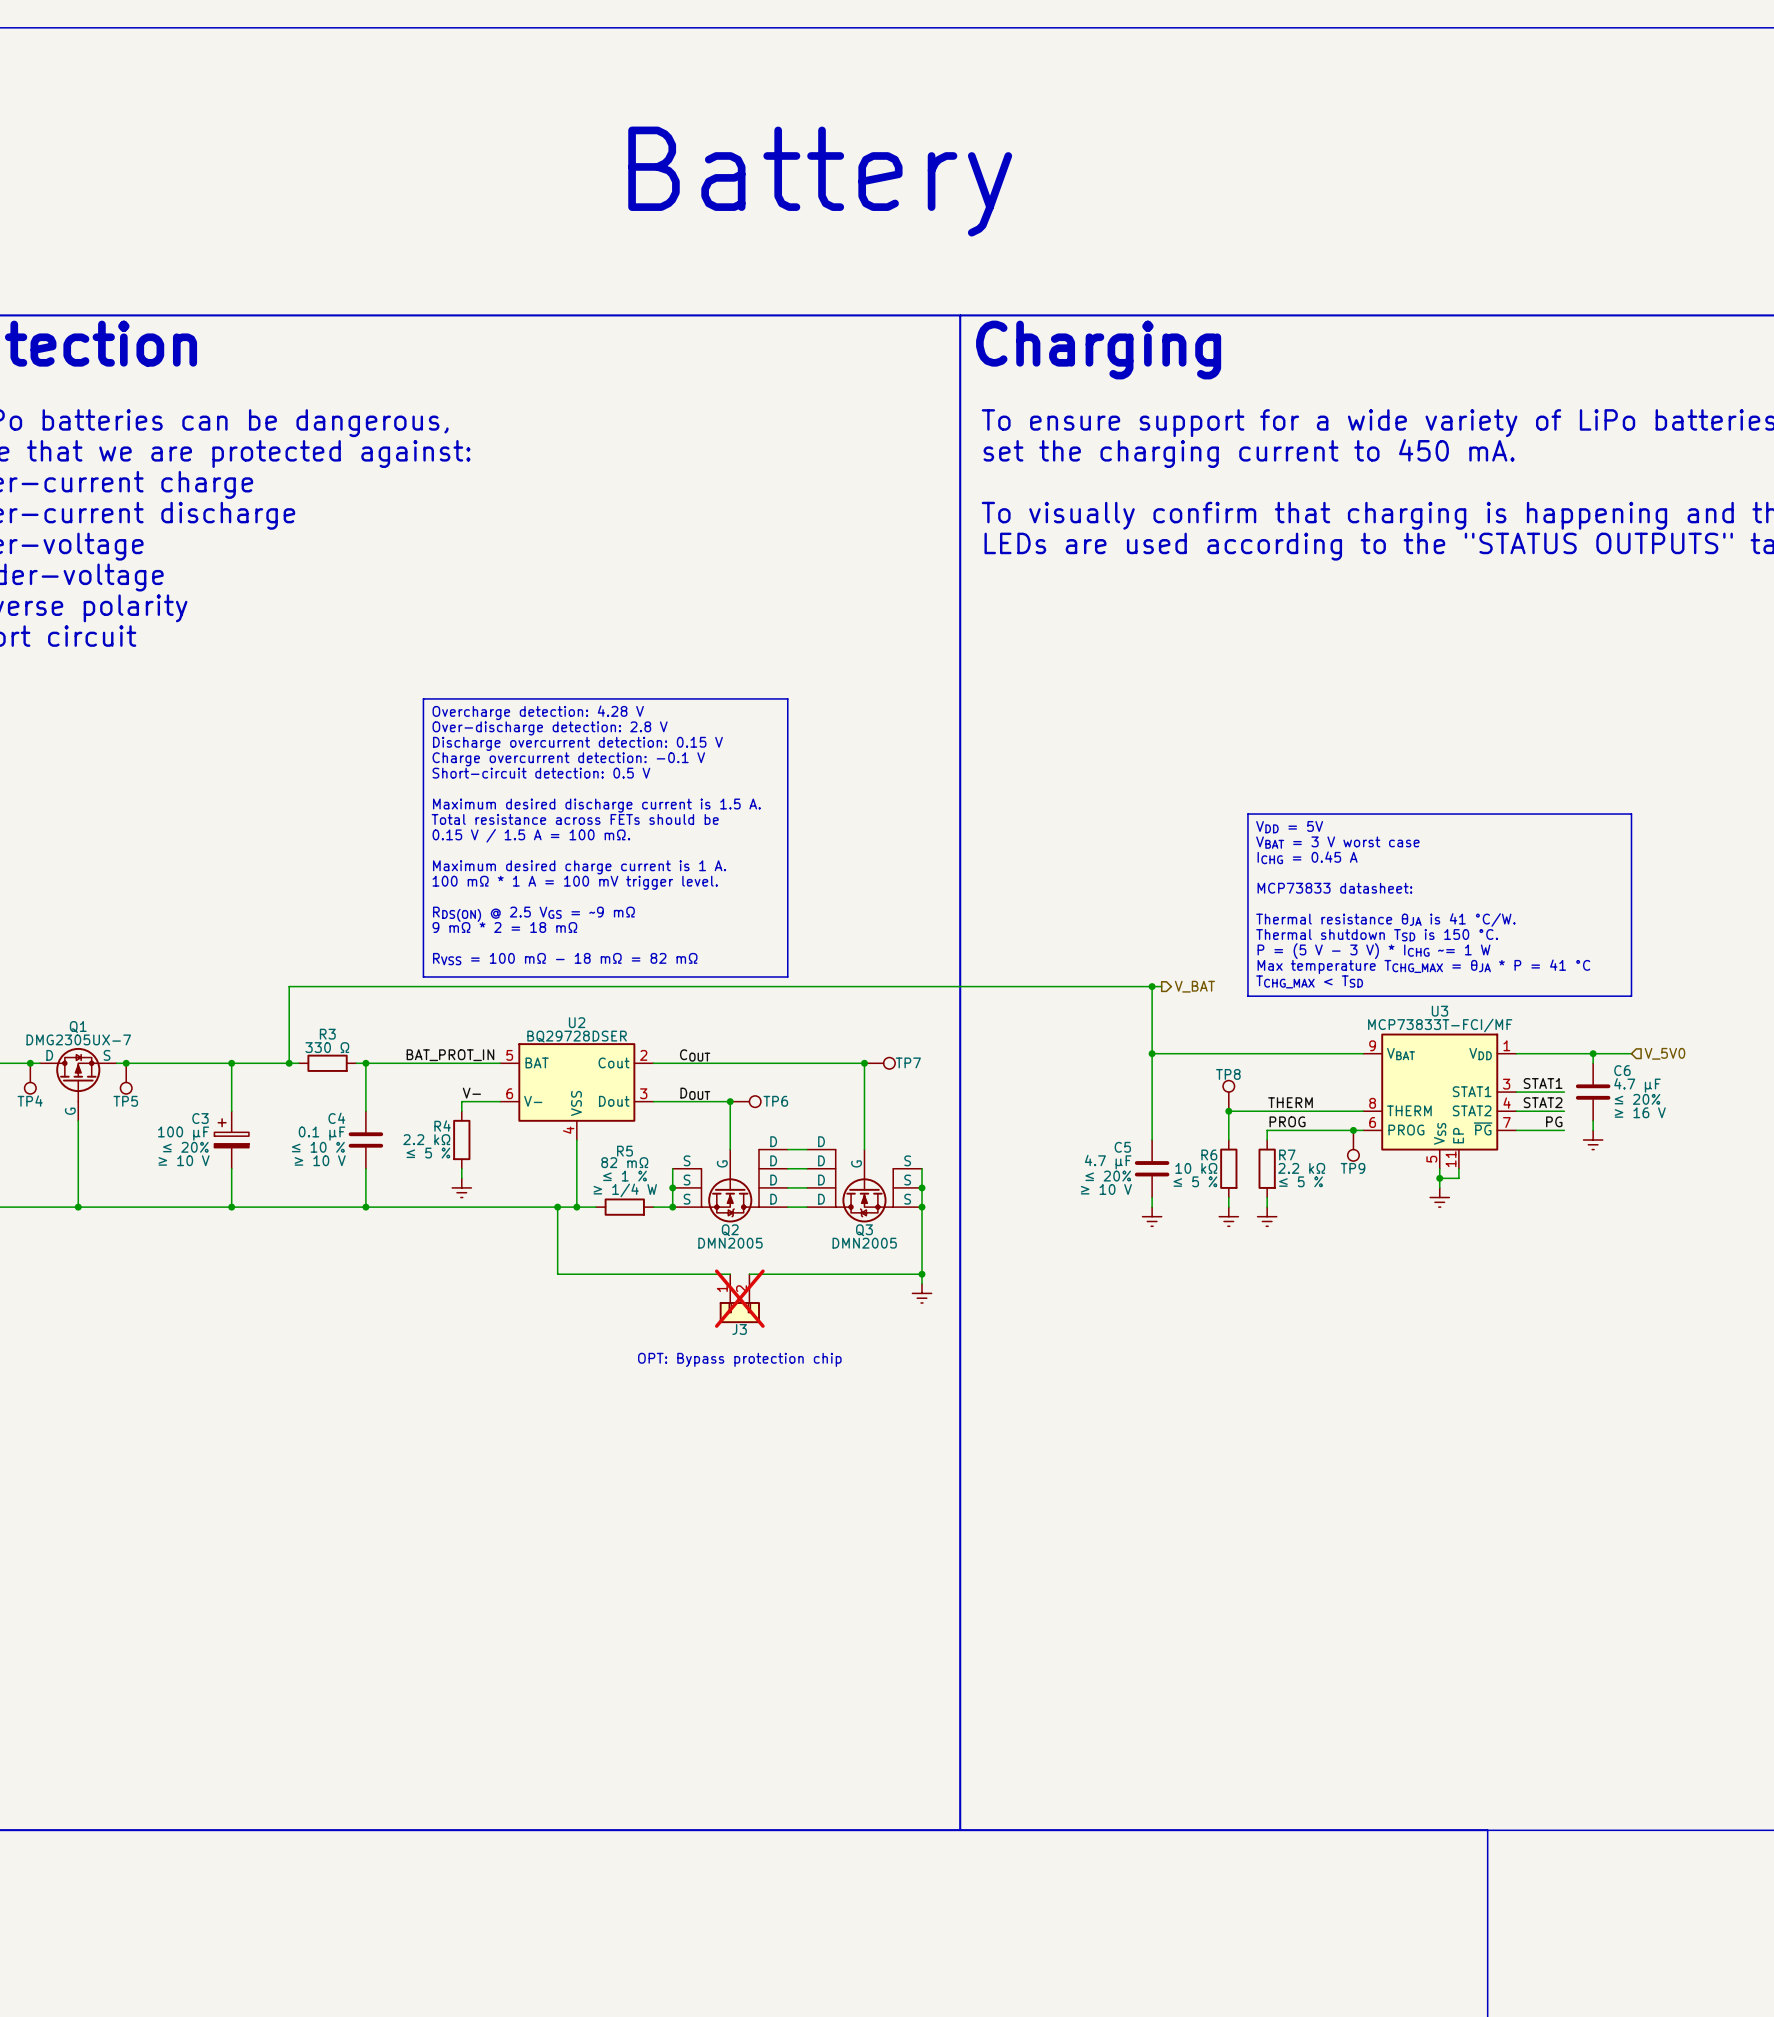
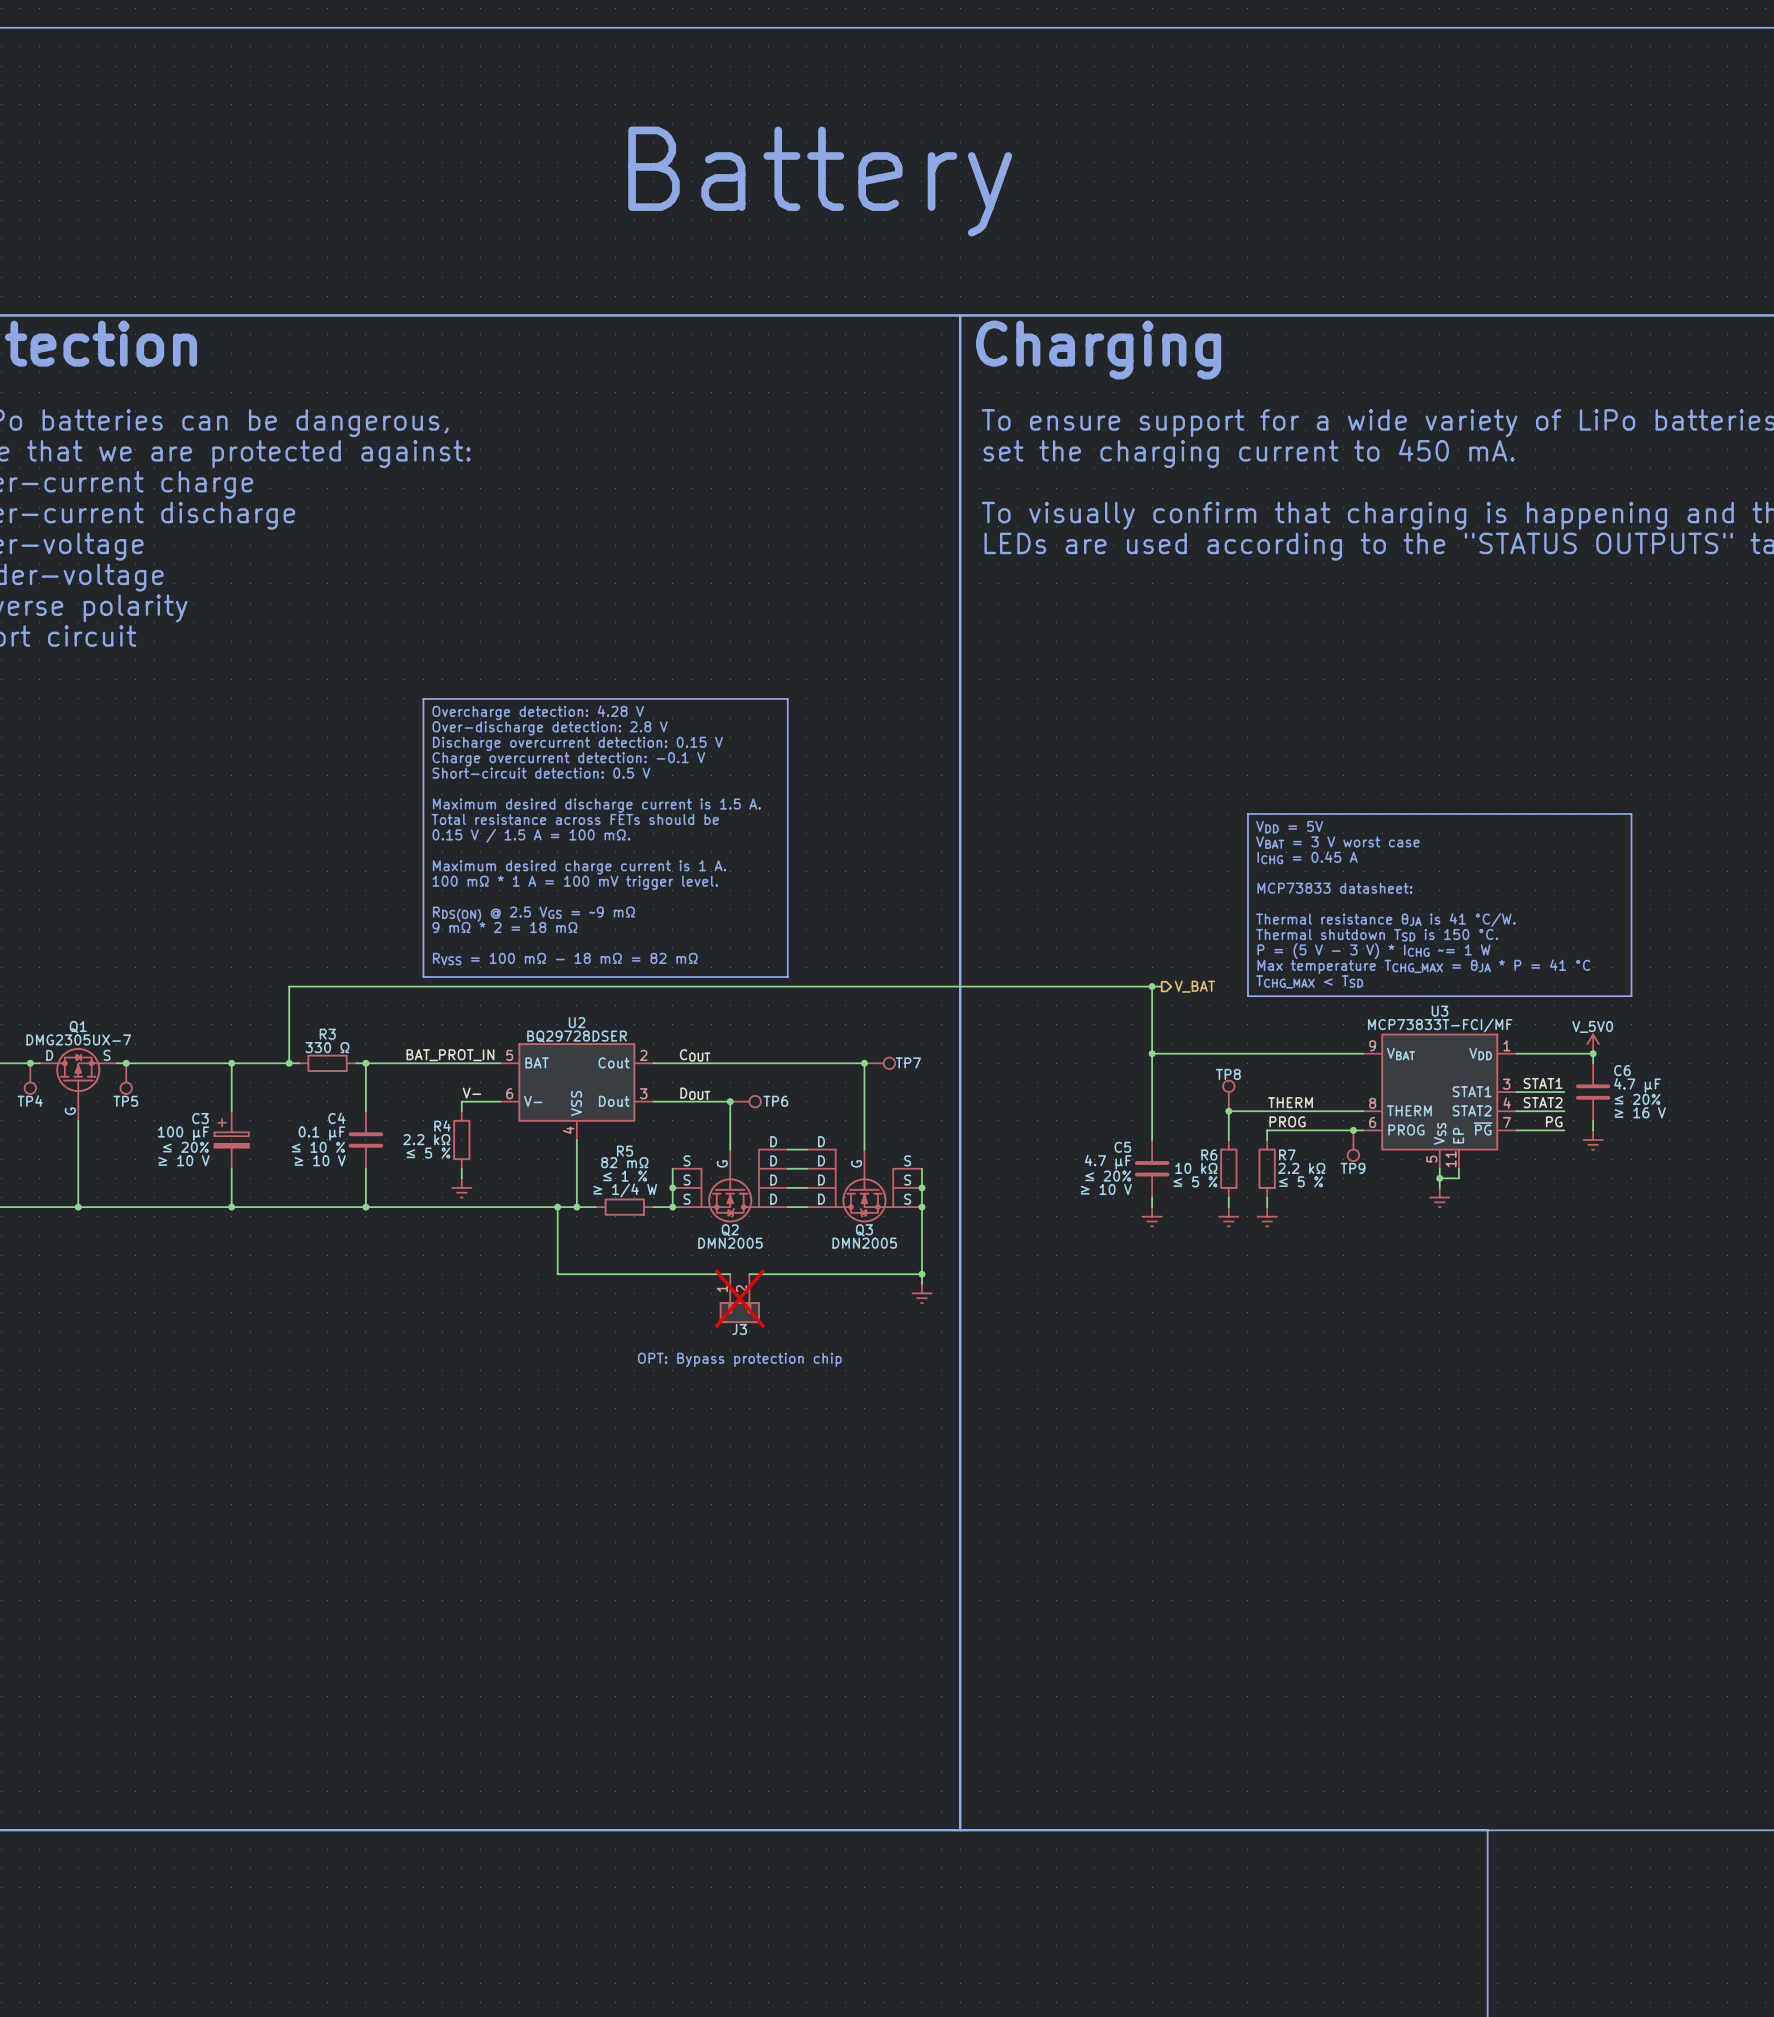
power symbol: none -> V_5V0 (1593, 1044)
wire: (1593, 1053) (1631, 1053) -> none
hierarchical label: V_5V0 (1664, 1053) -> none

